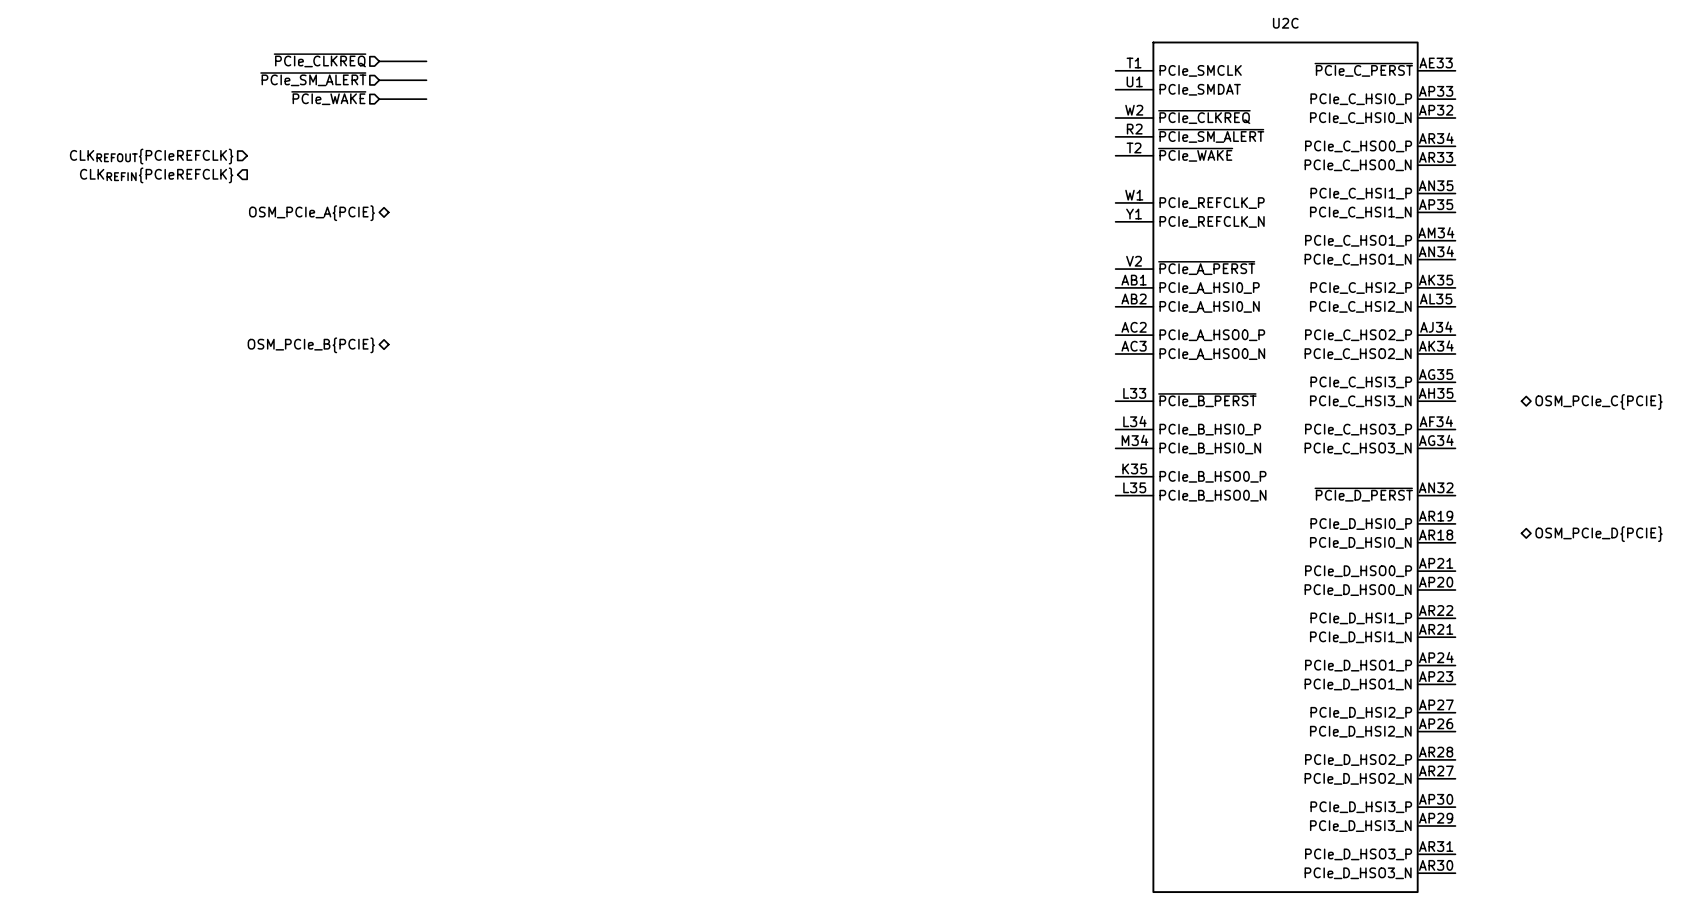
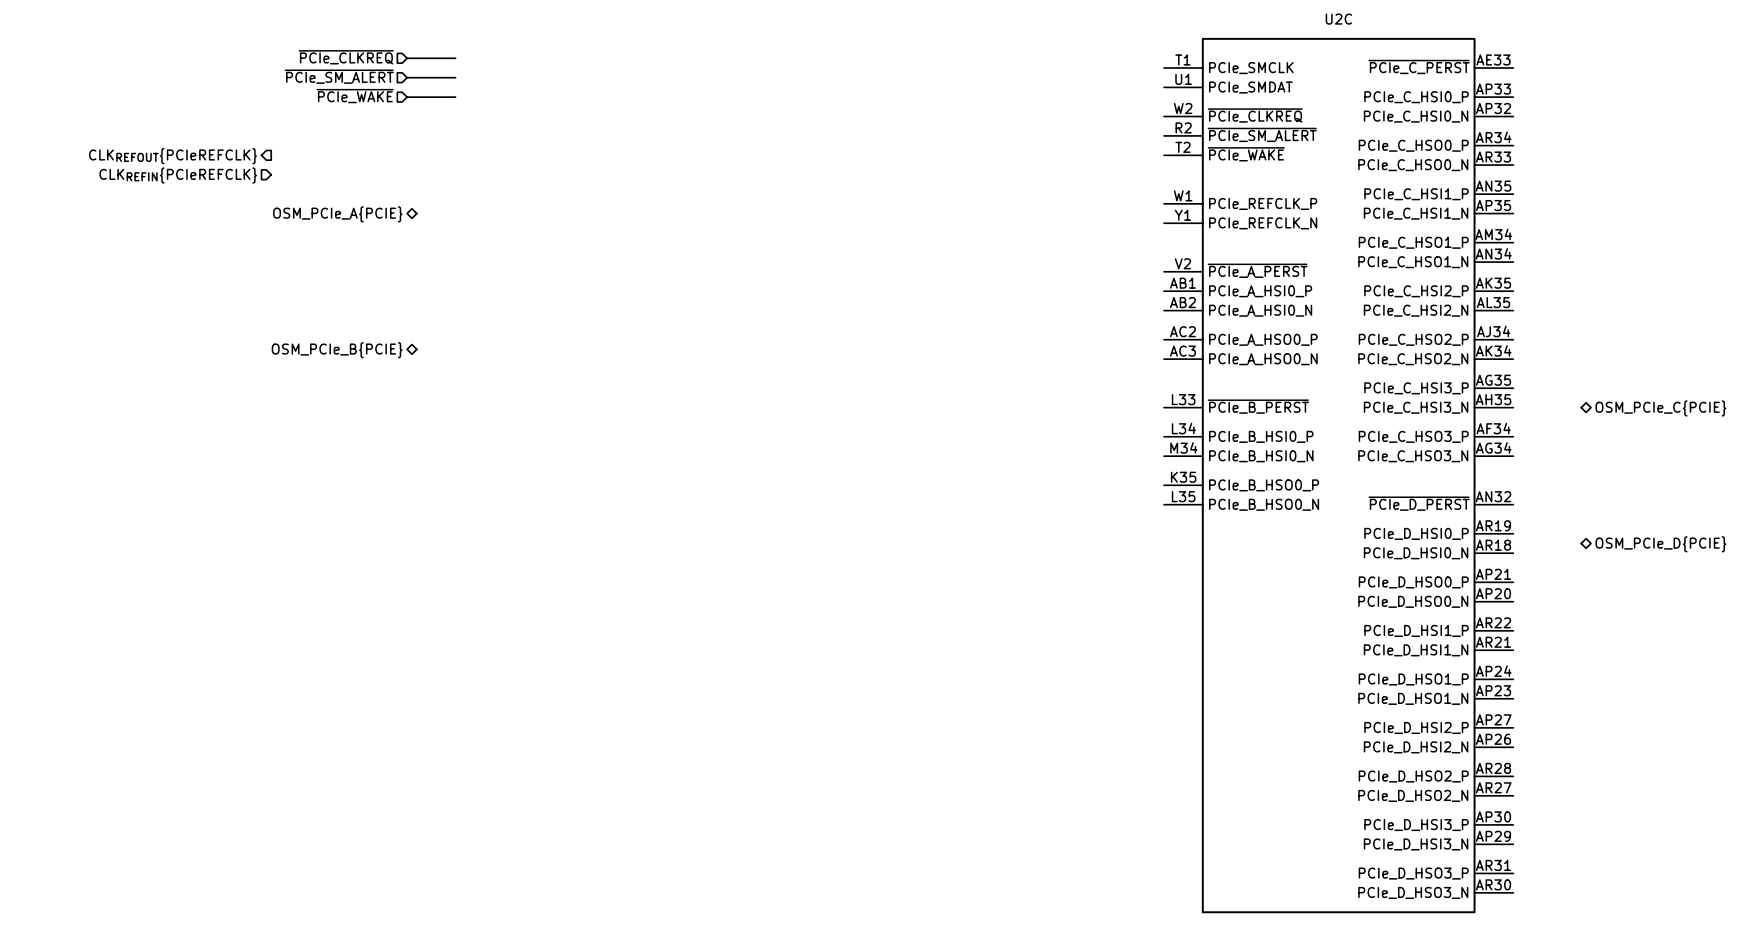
hierarchical label shape: input (151, 156) -> output (173, 156)
hierarchical label shape: output (156, 175) -> input (178, 175)

